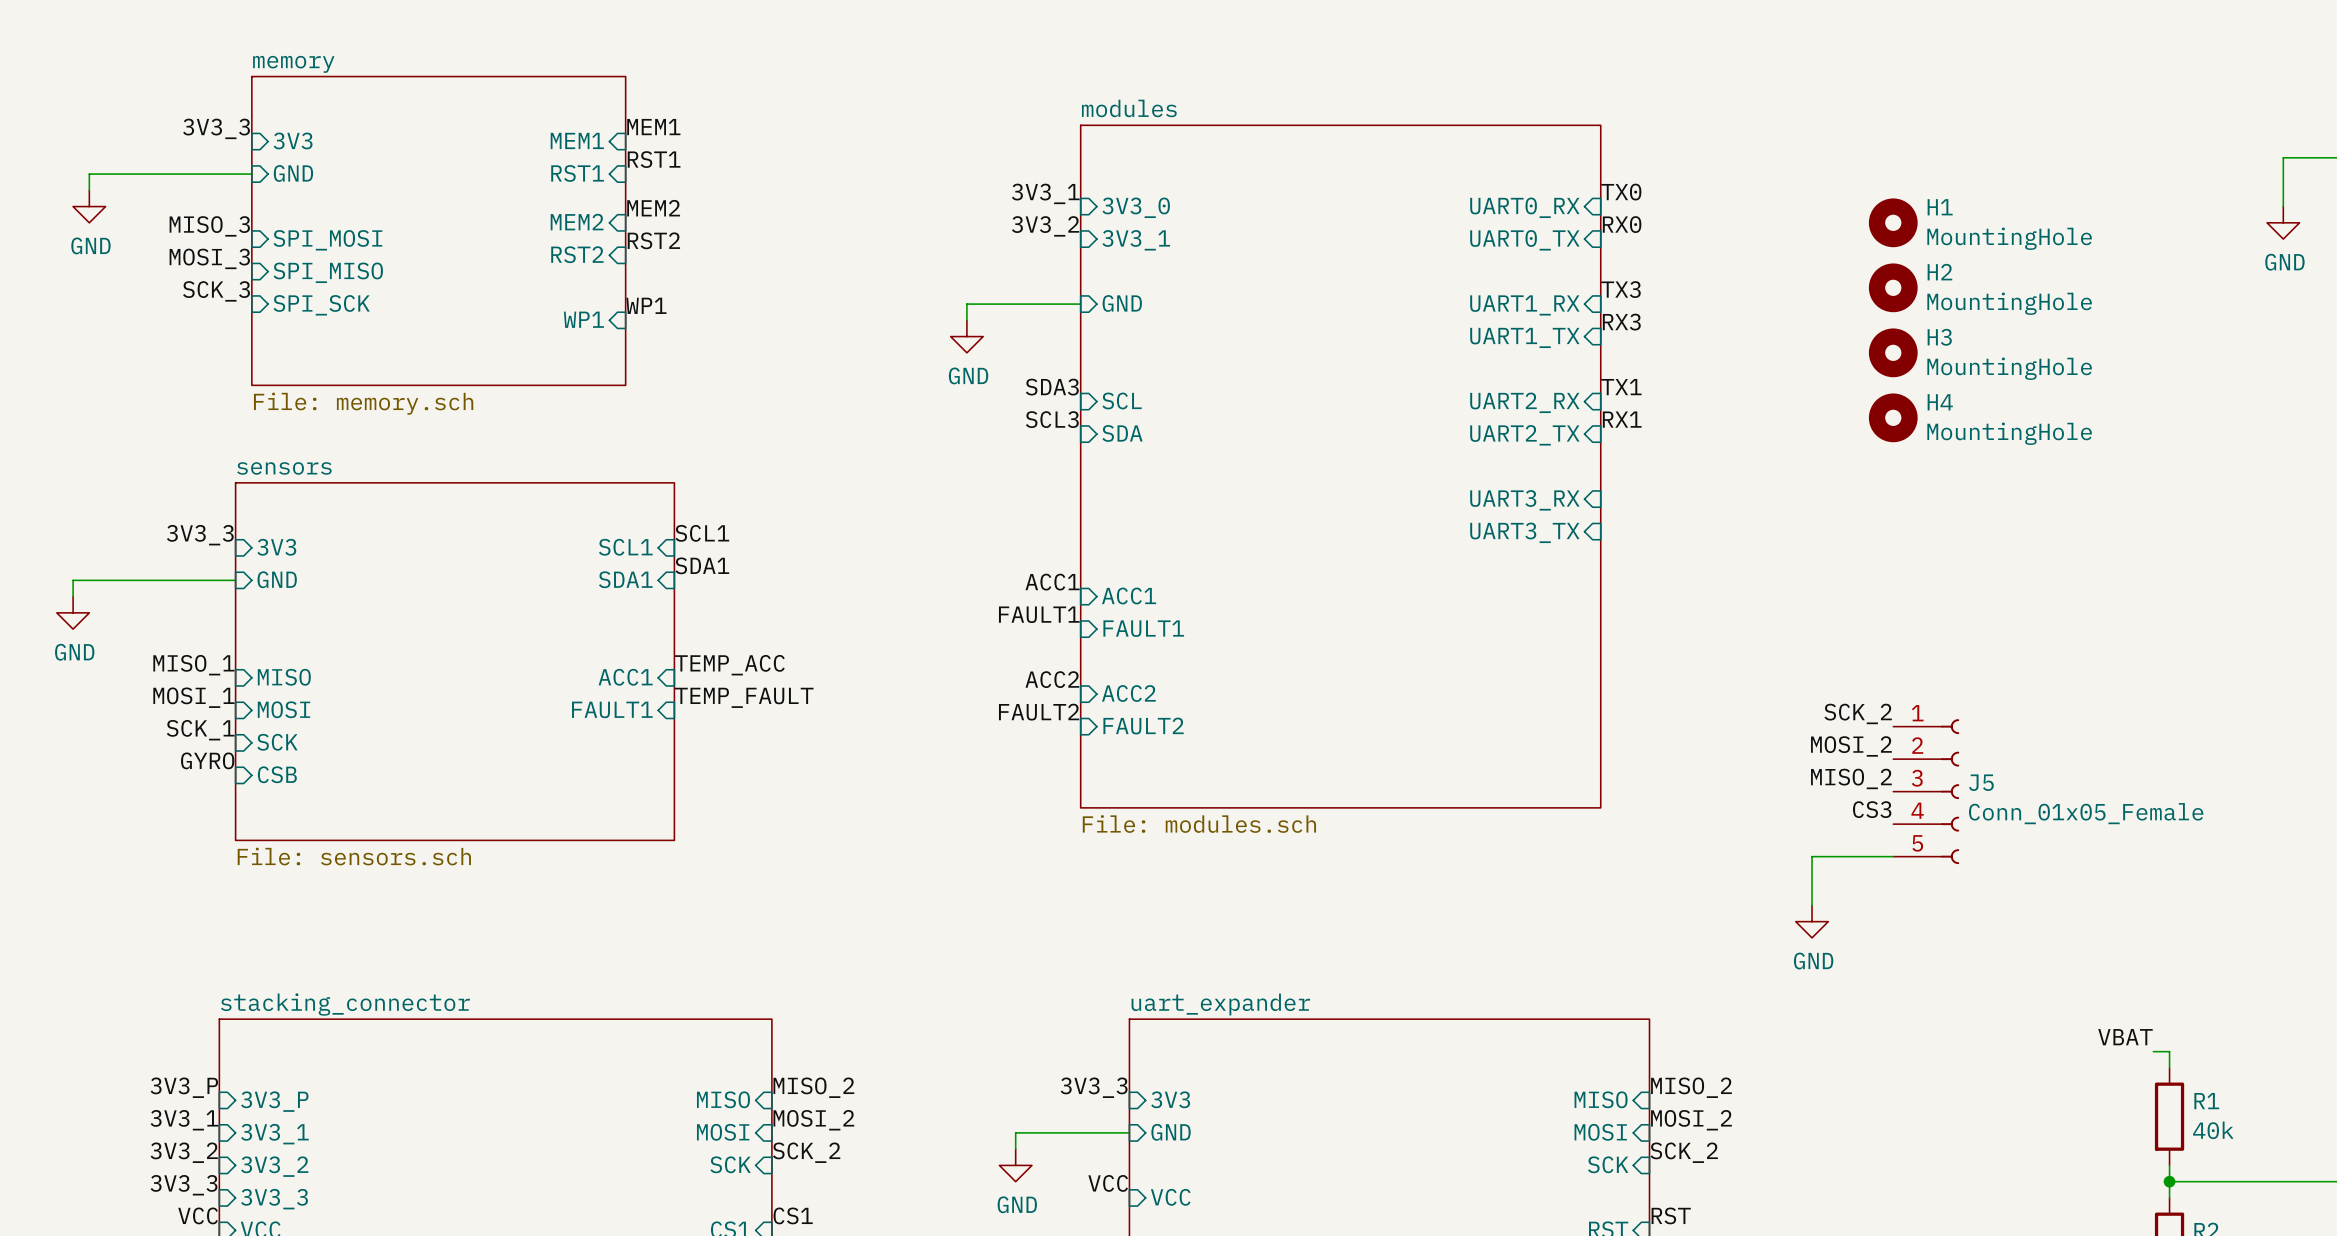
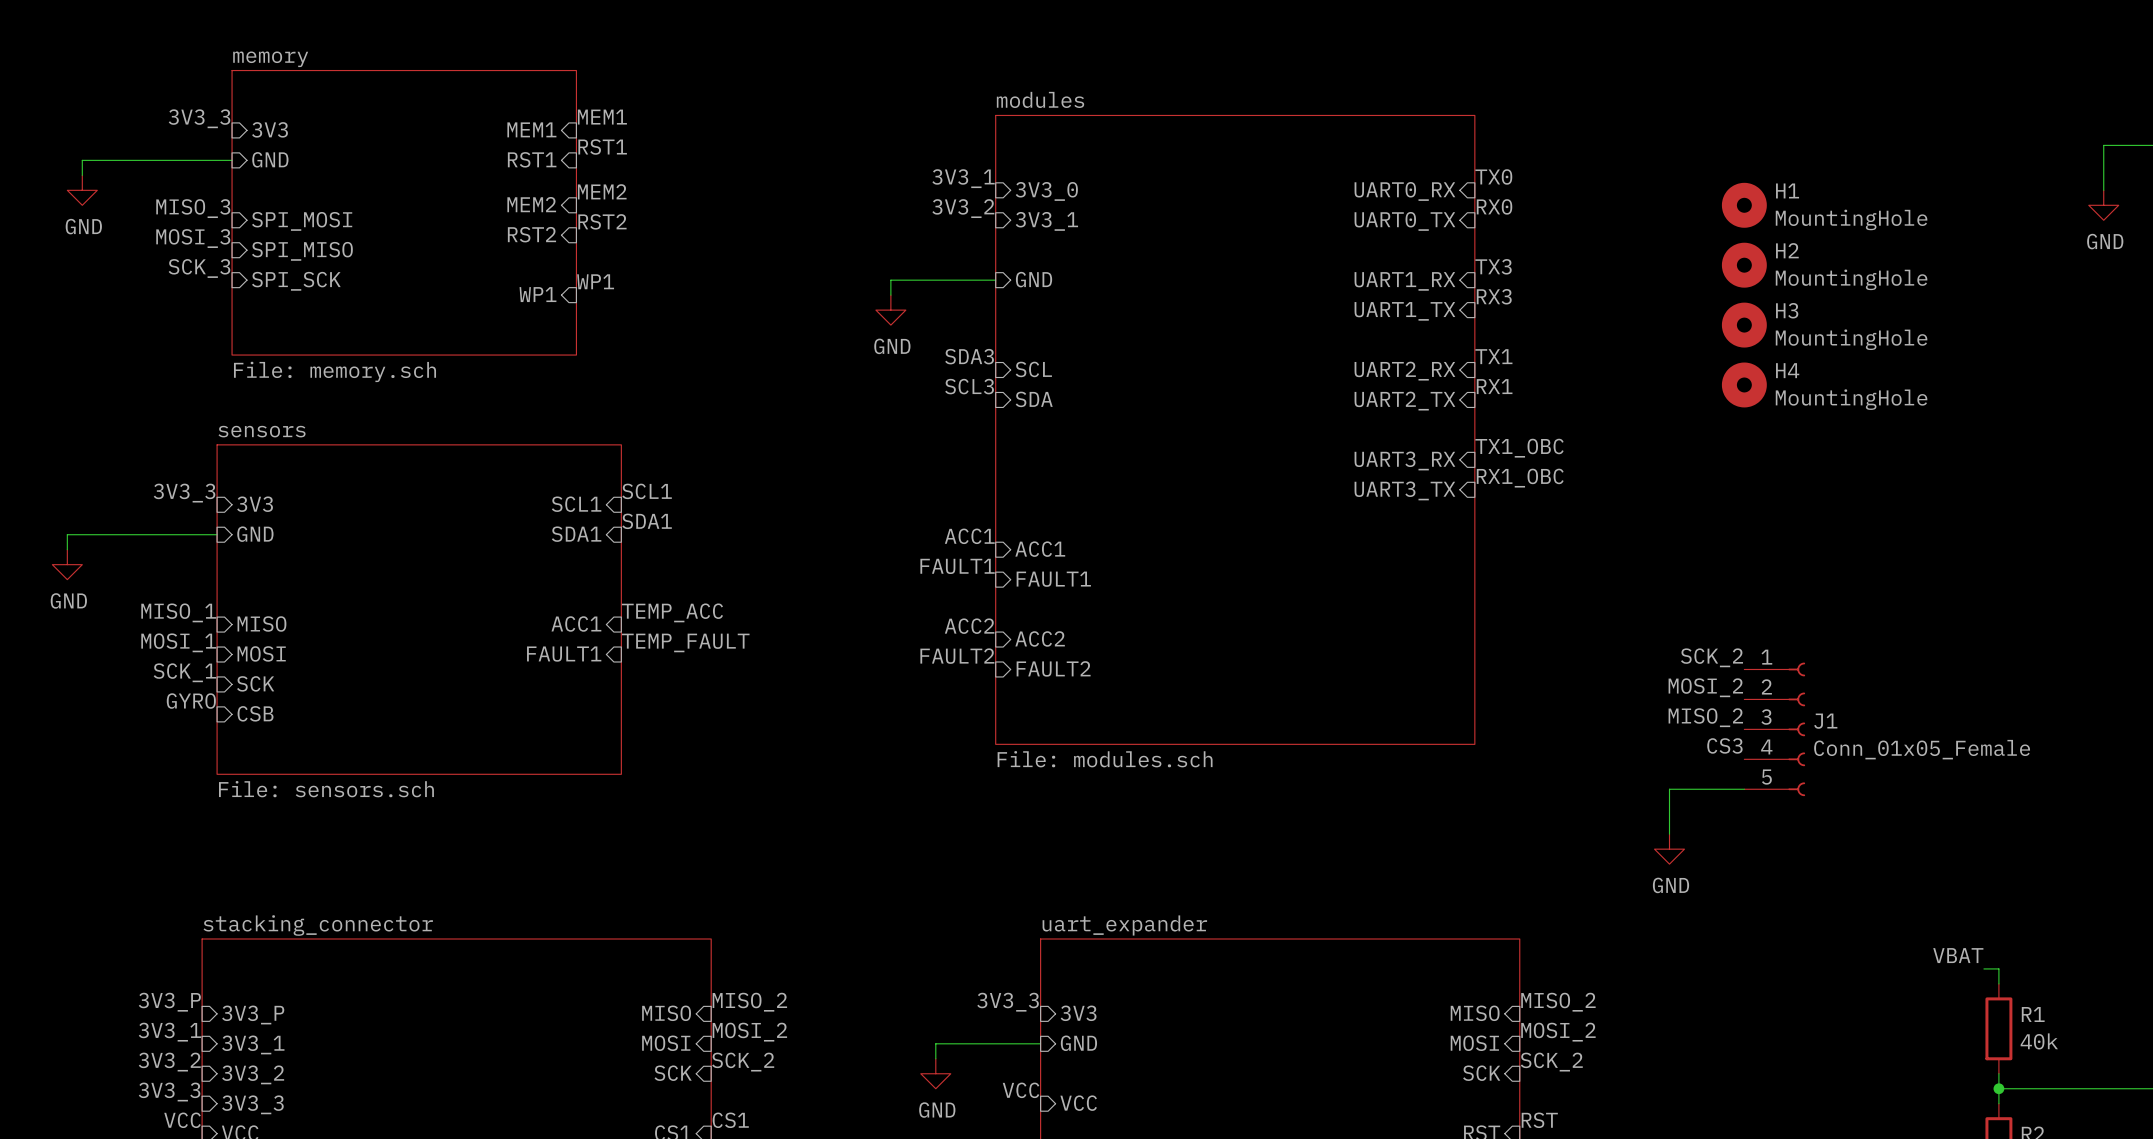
label: none -> TX1_OBC (1519, 448)
label: none -> RX1_OBC (1520, 478)
J5 name: J5 (1981, 782) -> J1 (1825, 721)

